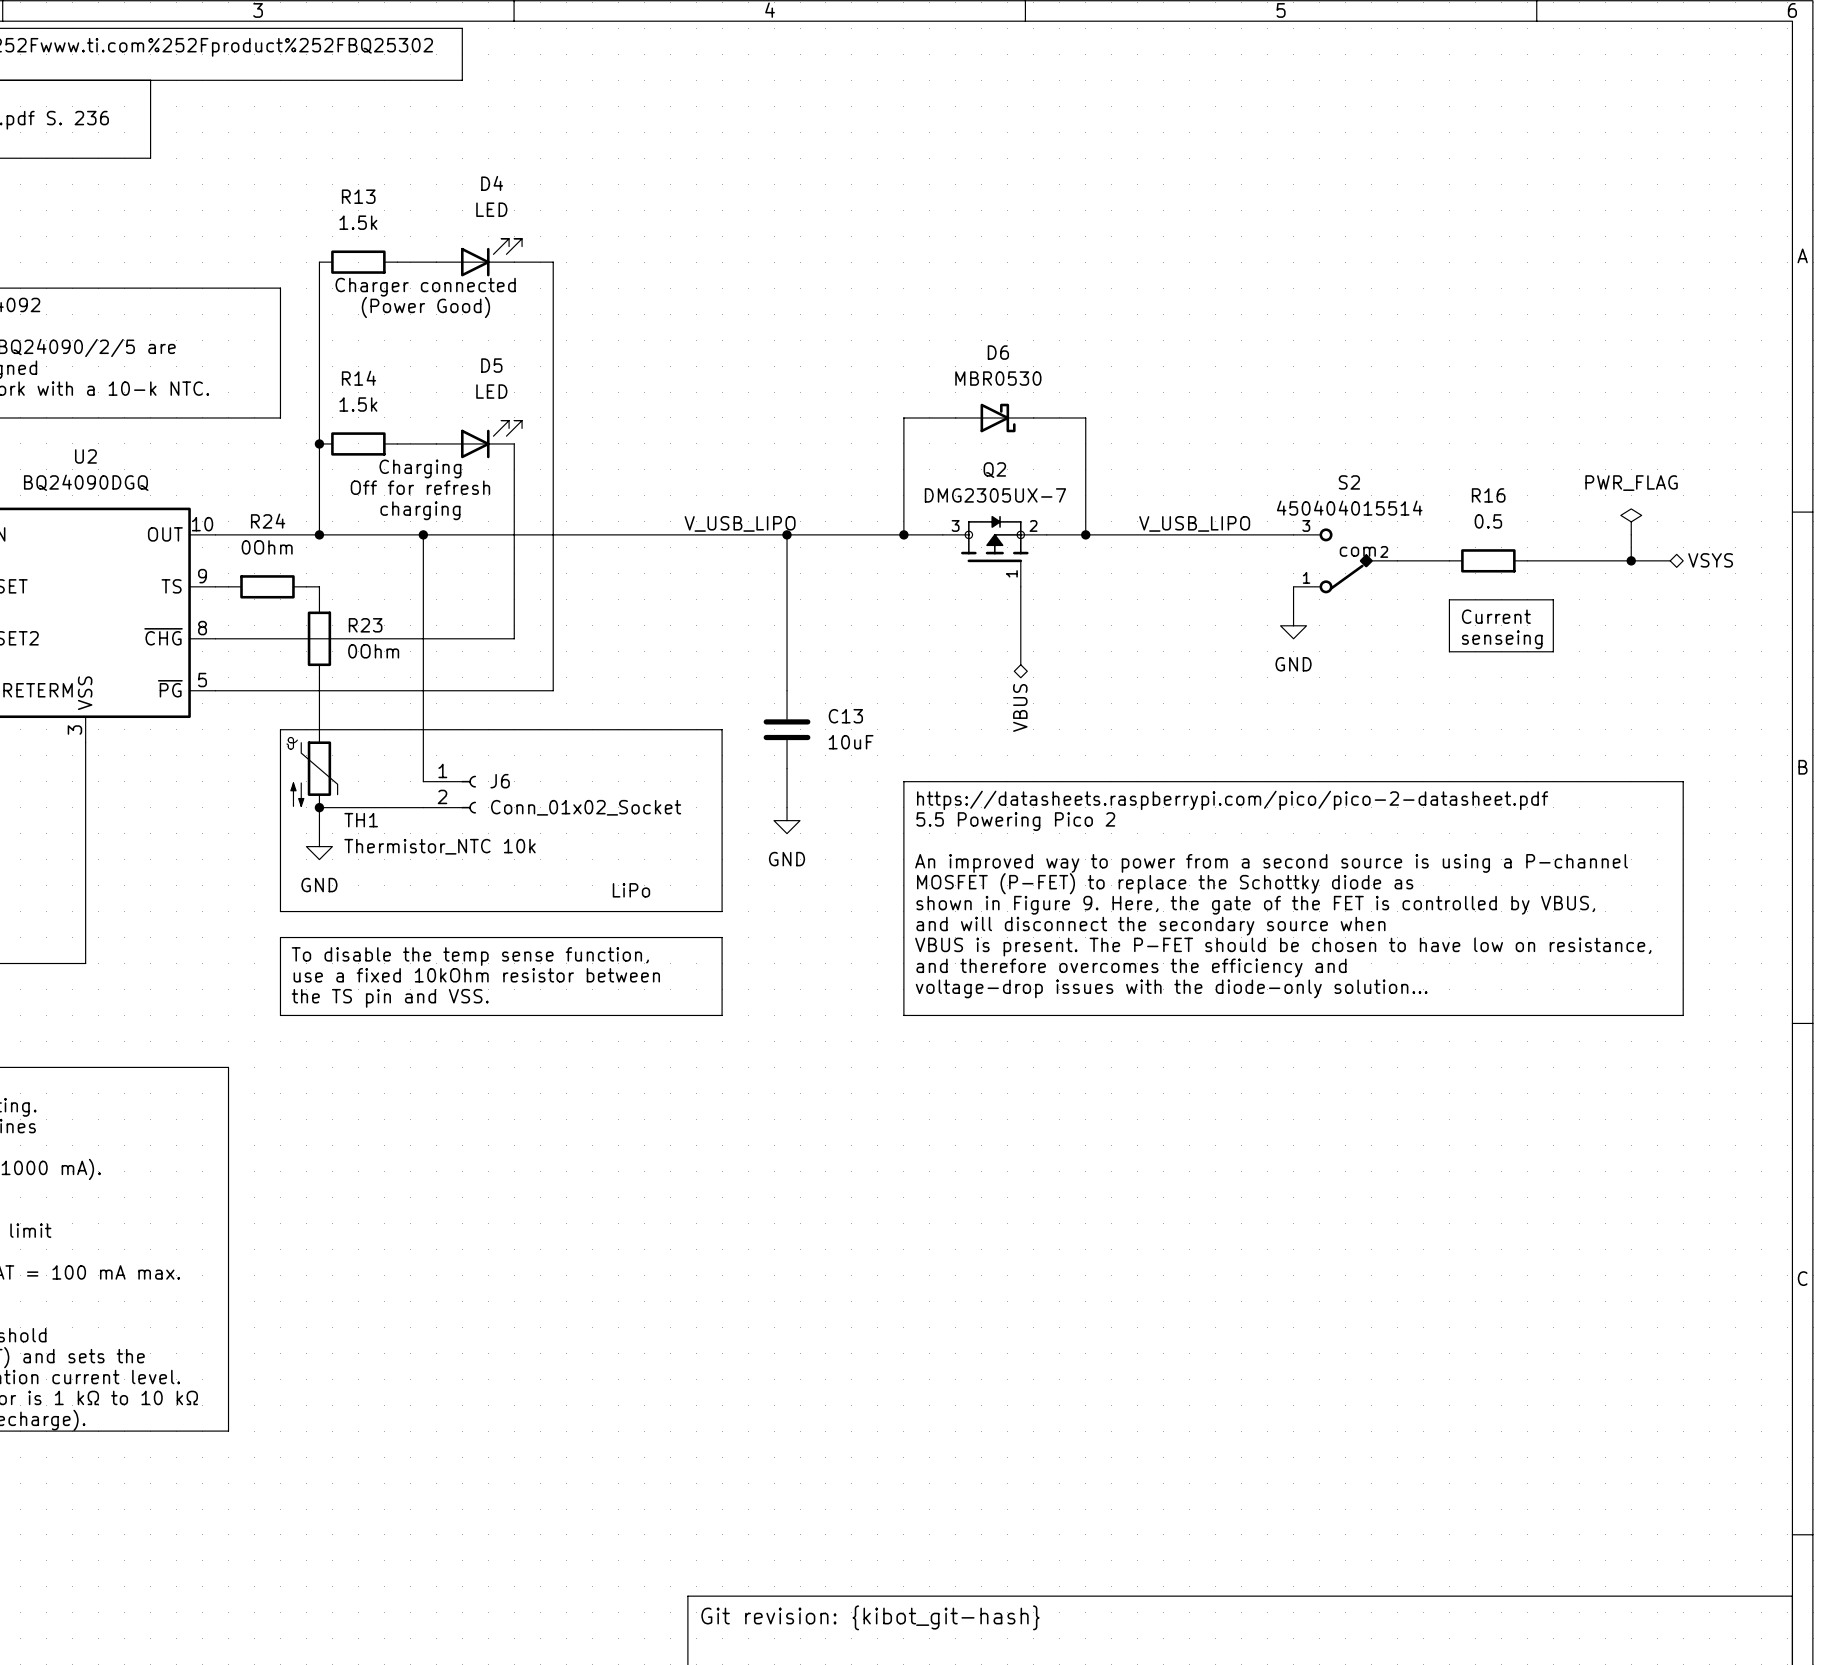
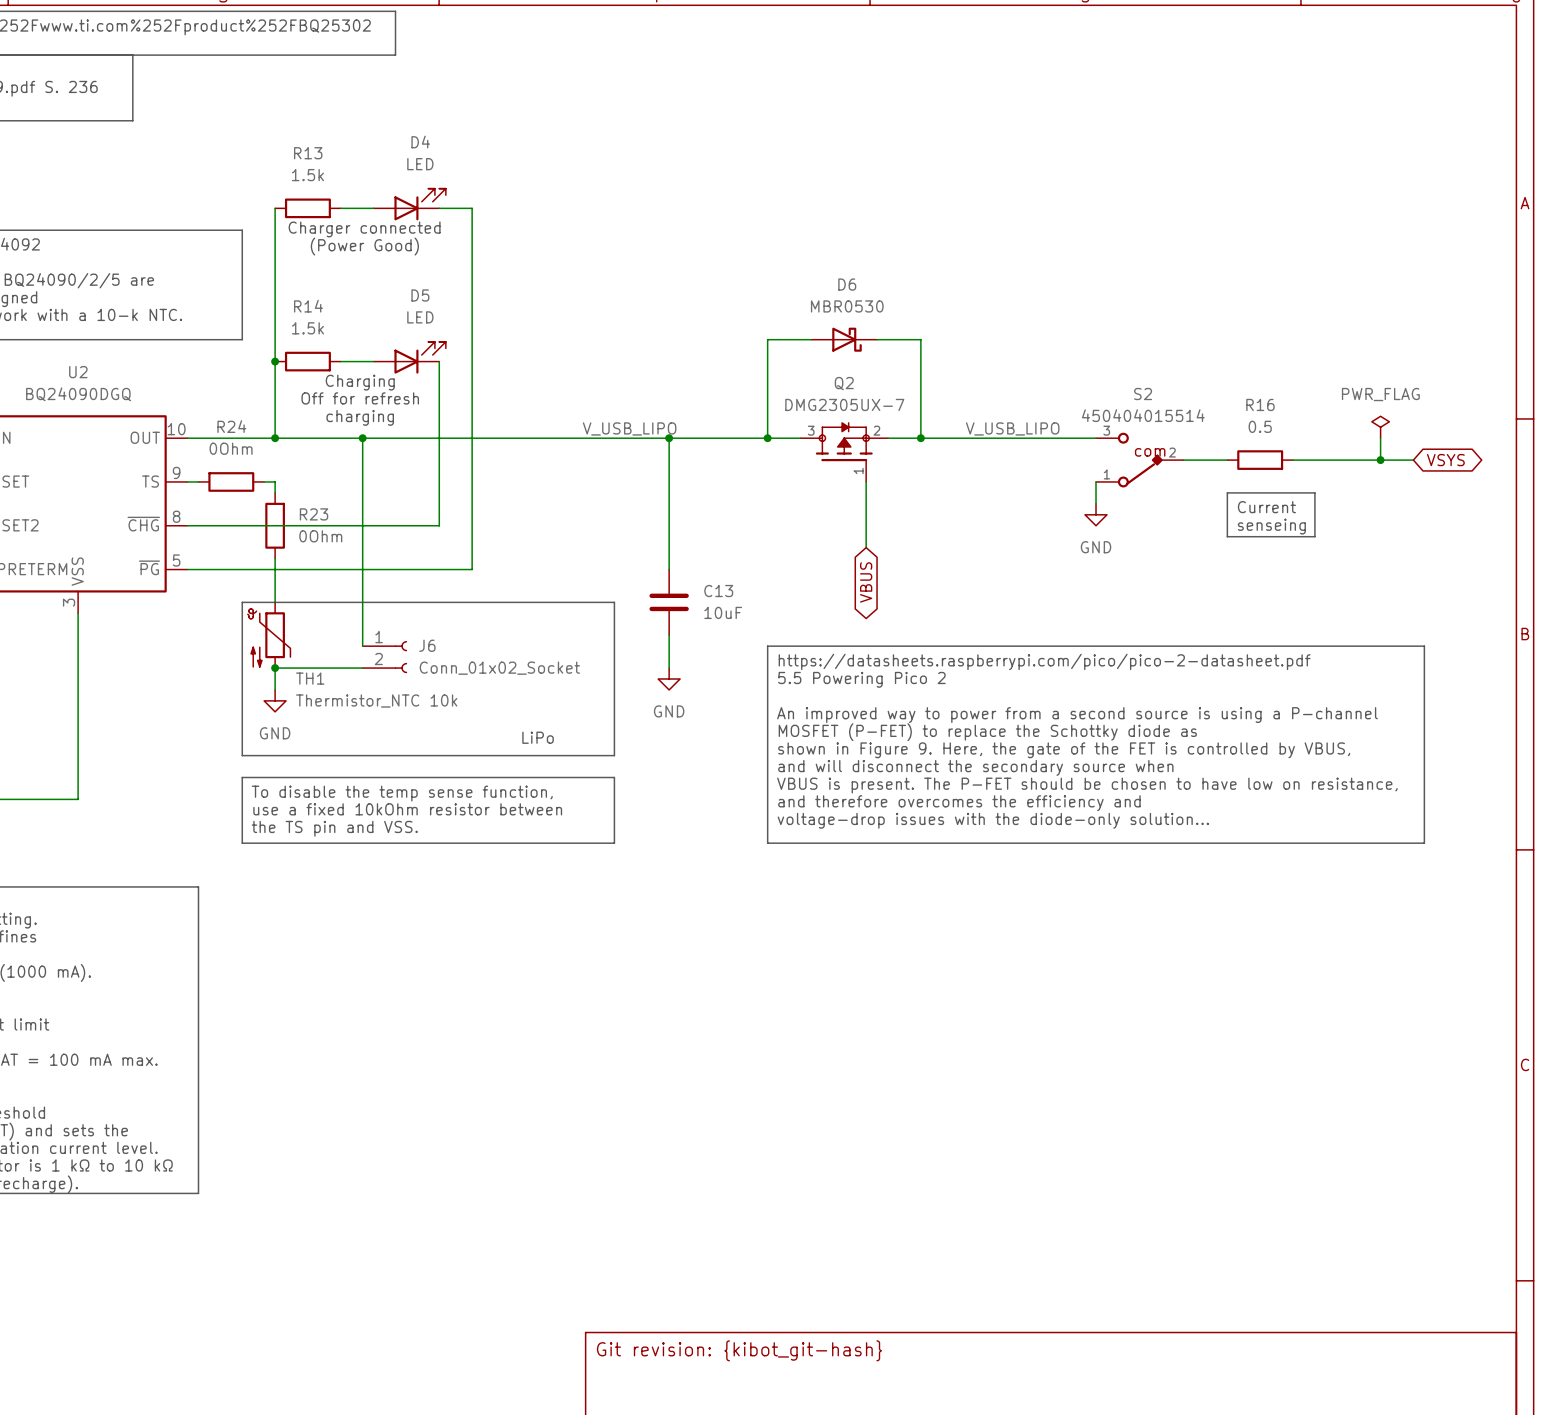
global label: none -> VSYS (1445, 460)
hierarchical label: VSYS (1710, 560) -> none
global label: none -> VBUS (866, 582)
hierarchical label: VBUS (1020, 707) -> none

